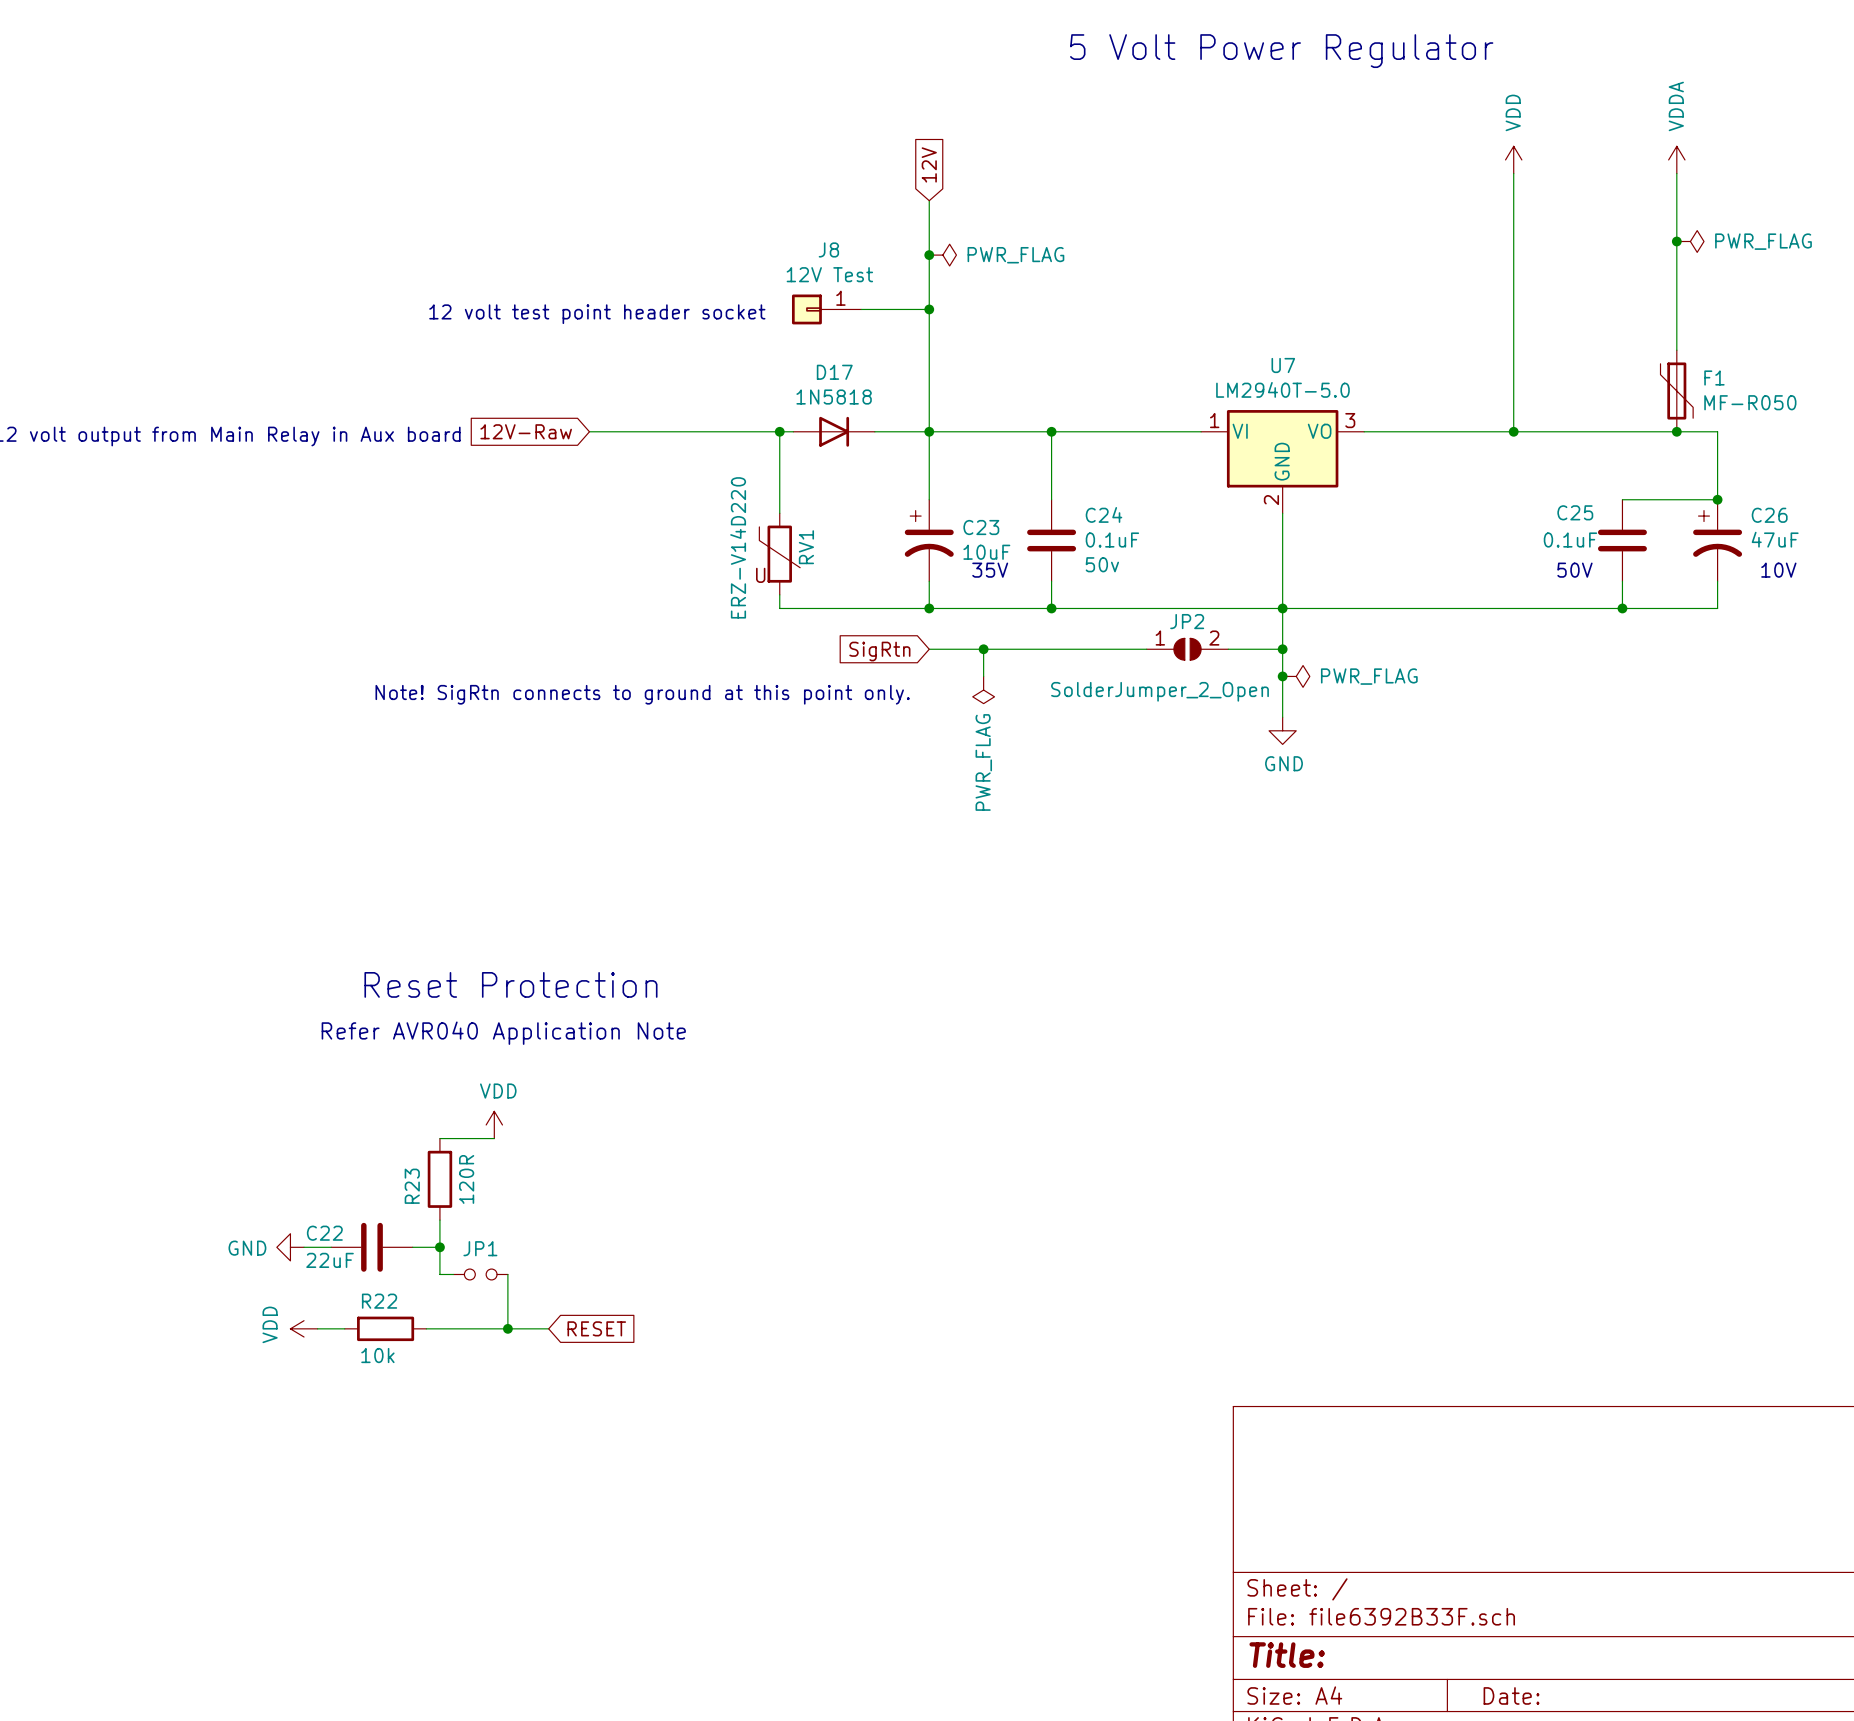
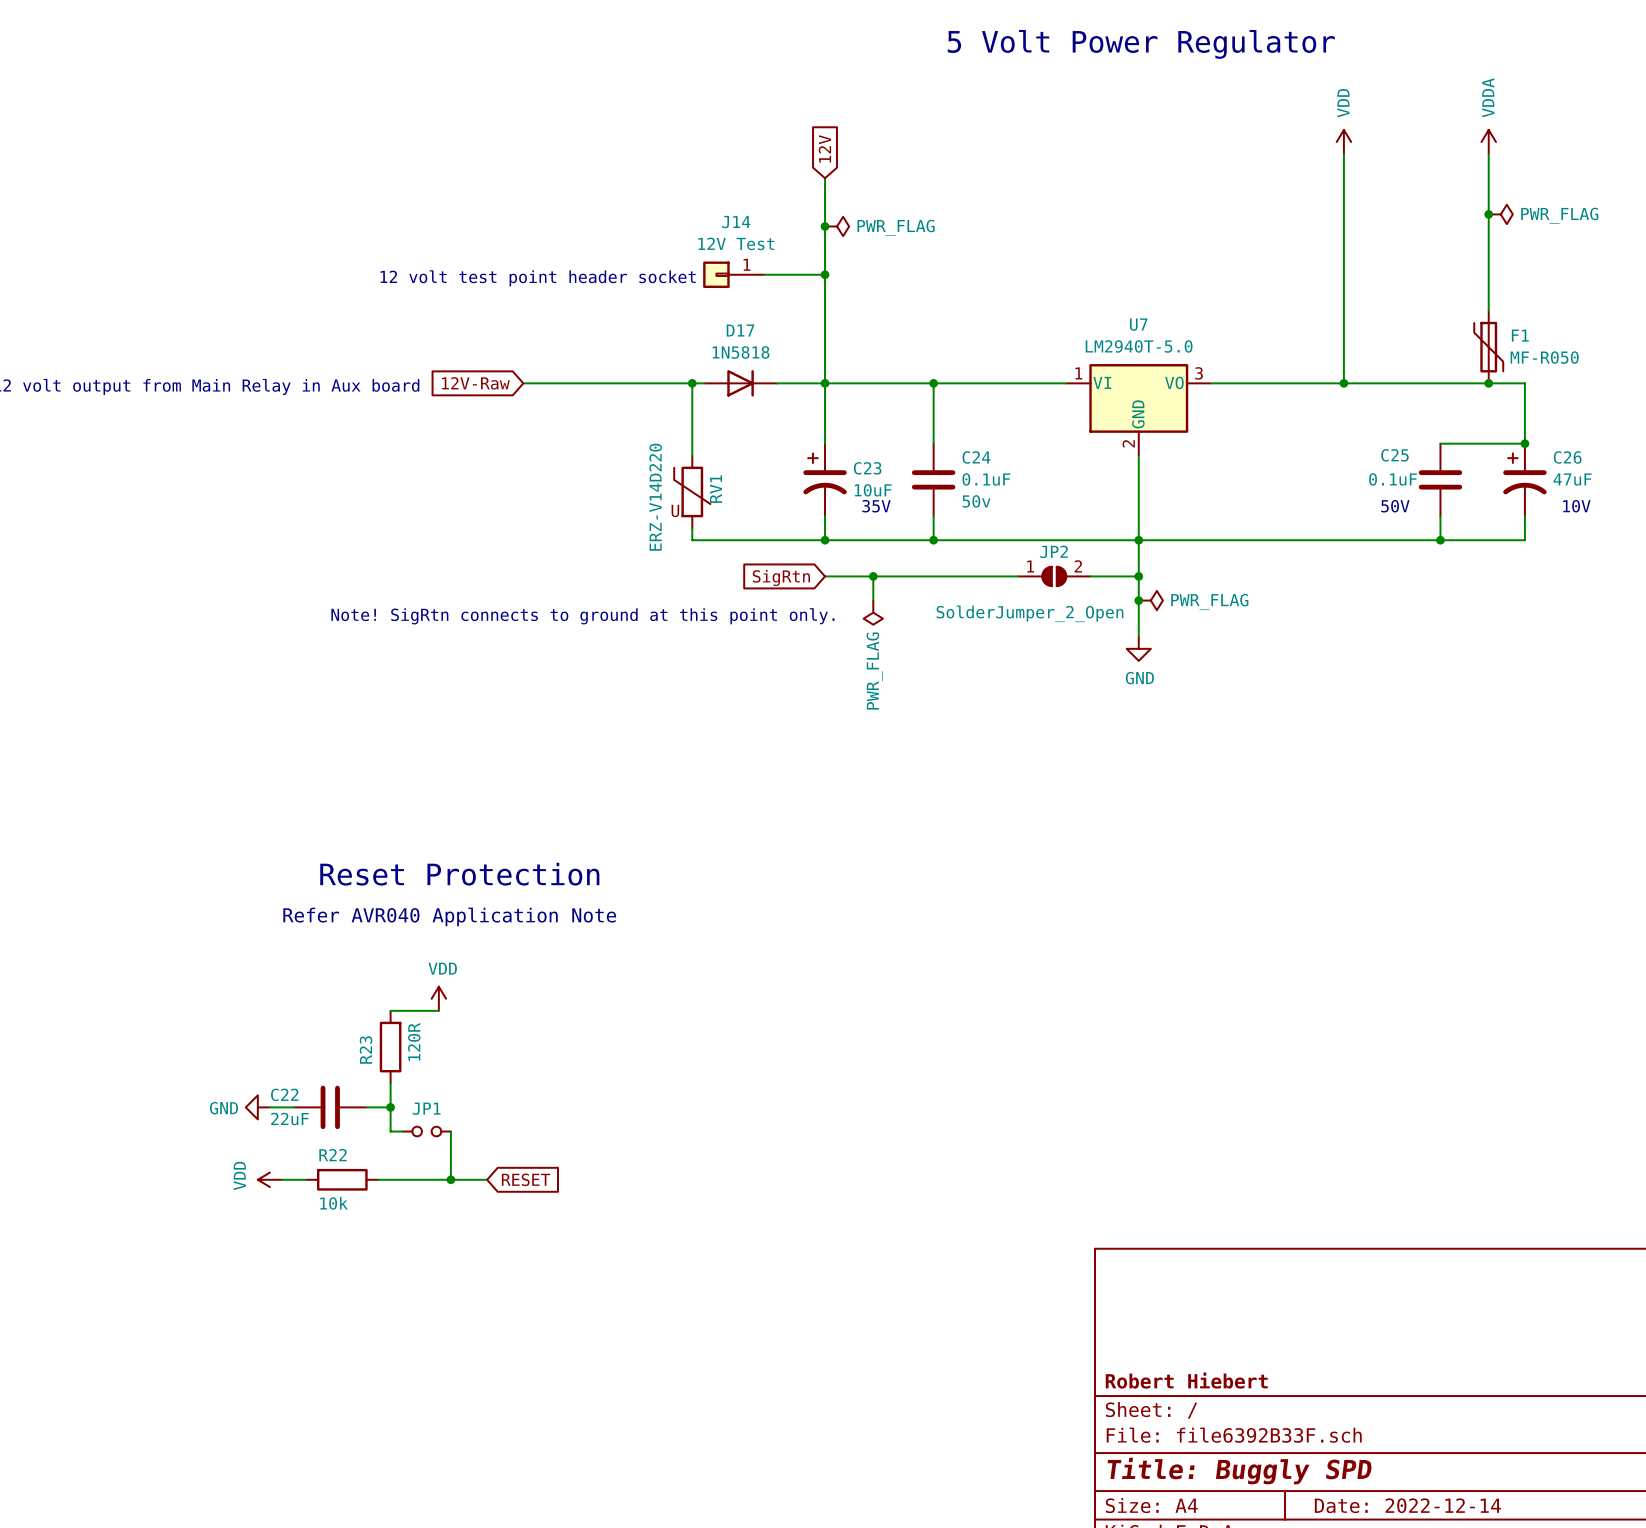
J8 name: J8 (828, 249) -> J14 (736, 222)
title block: none -> Robert Hiebert (1186, 1380)
title block: Title: (1287, 1655) -> Title: Buggly SPD (1239, 1471)
title block: Date: (1511, 1695) -> Date: 2022-12-14 (1407, 1505)

